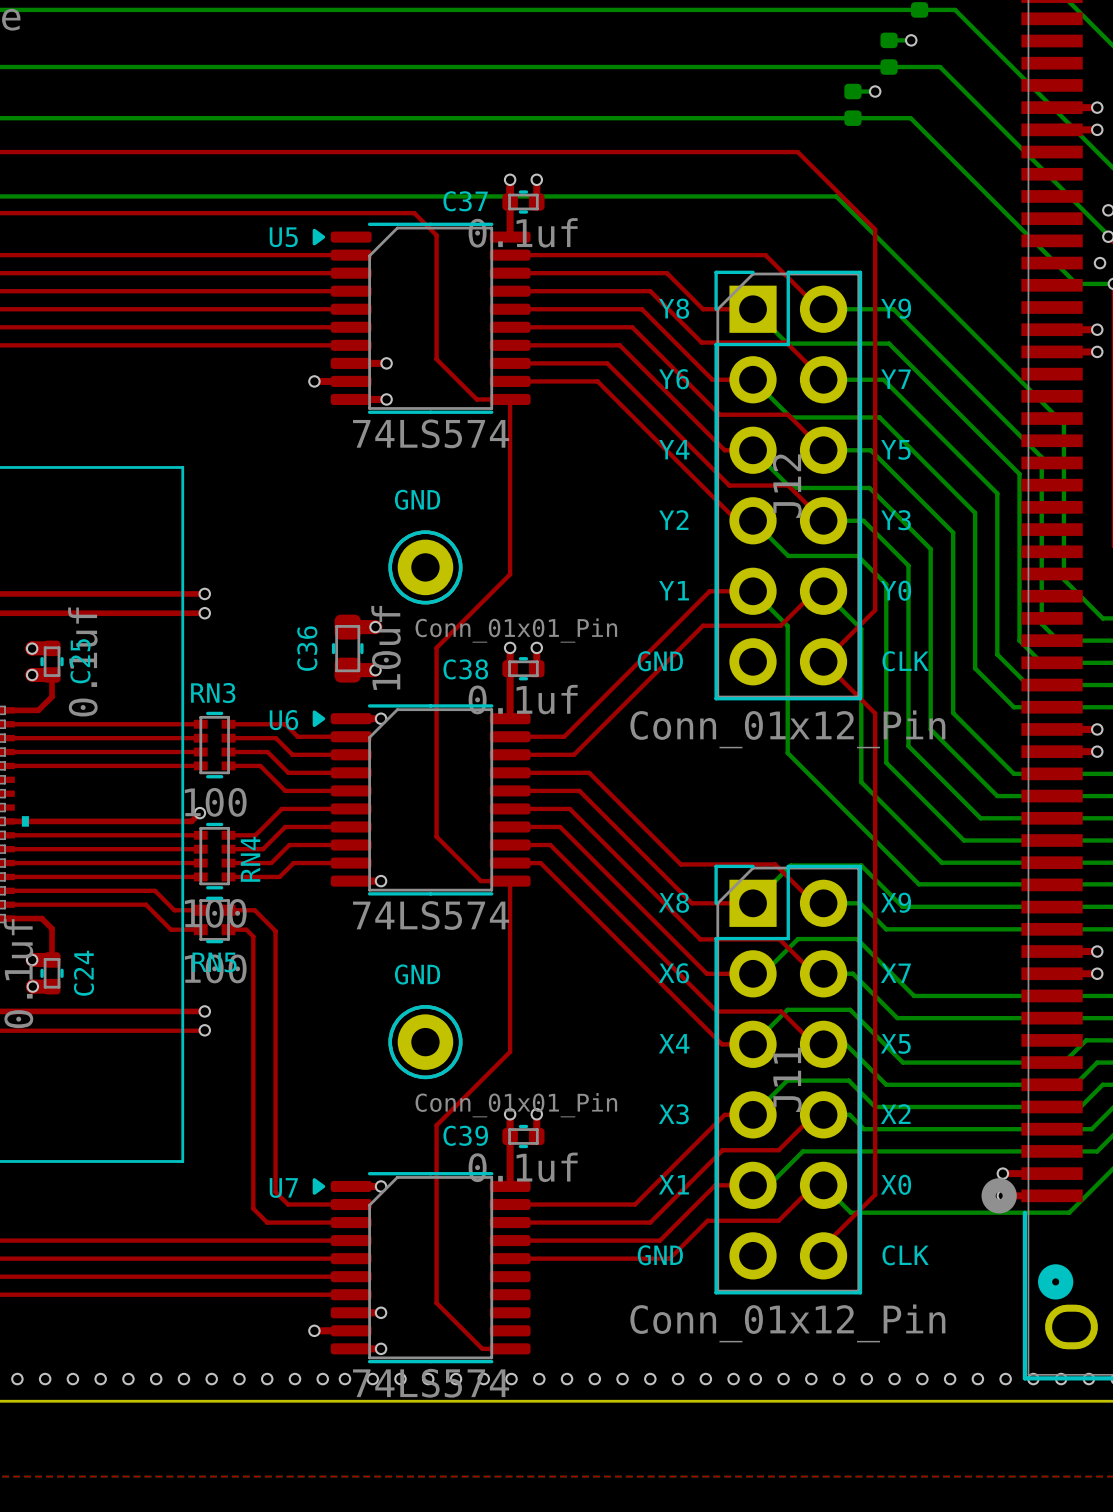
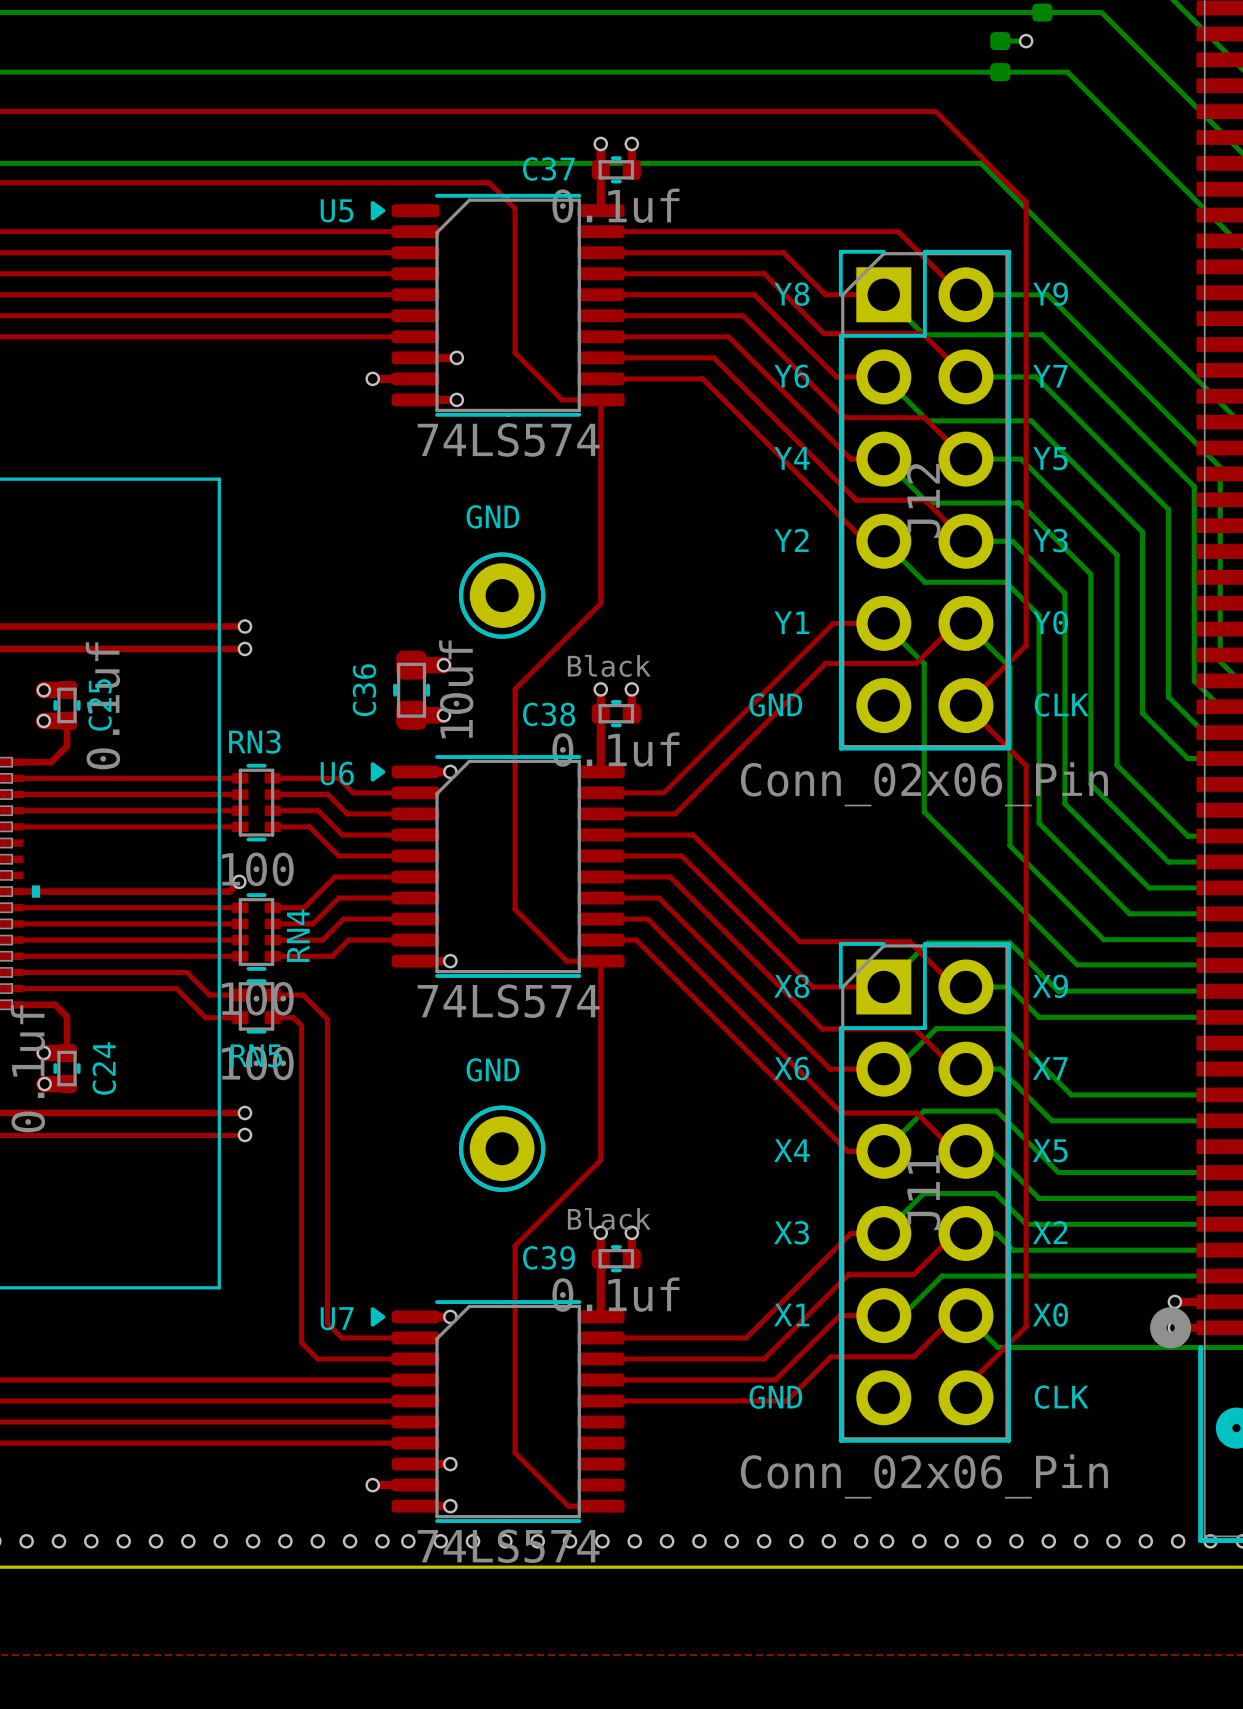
part value: Conn_01x01_Pin (516, 630) -> Black (609, 665)
J12 value: Conn_01x12_Pin (787, 729) -> Conn_02x06_Pin (924, 784)
part value: Conn_01x01_Pin (516, 1105) -> Black (609, 1219)
J11 value: Conn_01x12_Pin (787, 1323) -> Conn_02x06_Pin (924, 1476)

